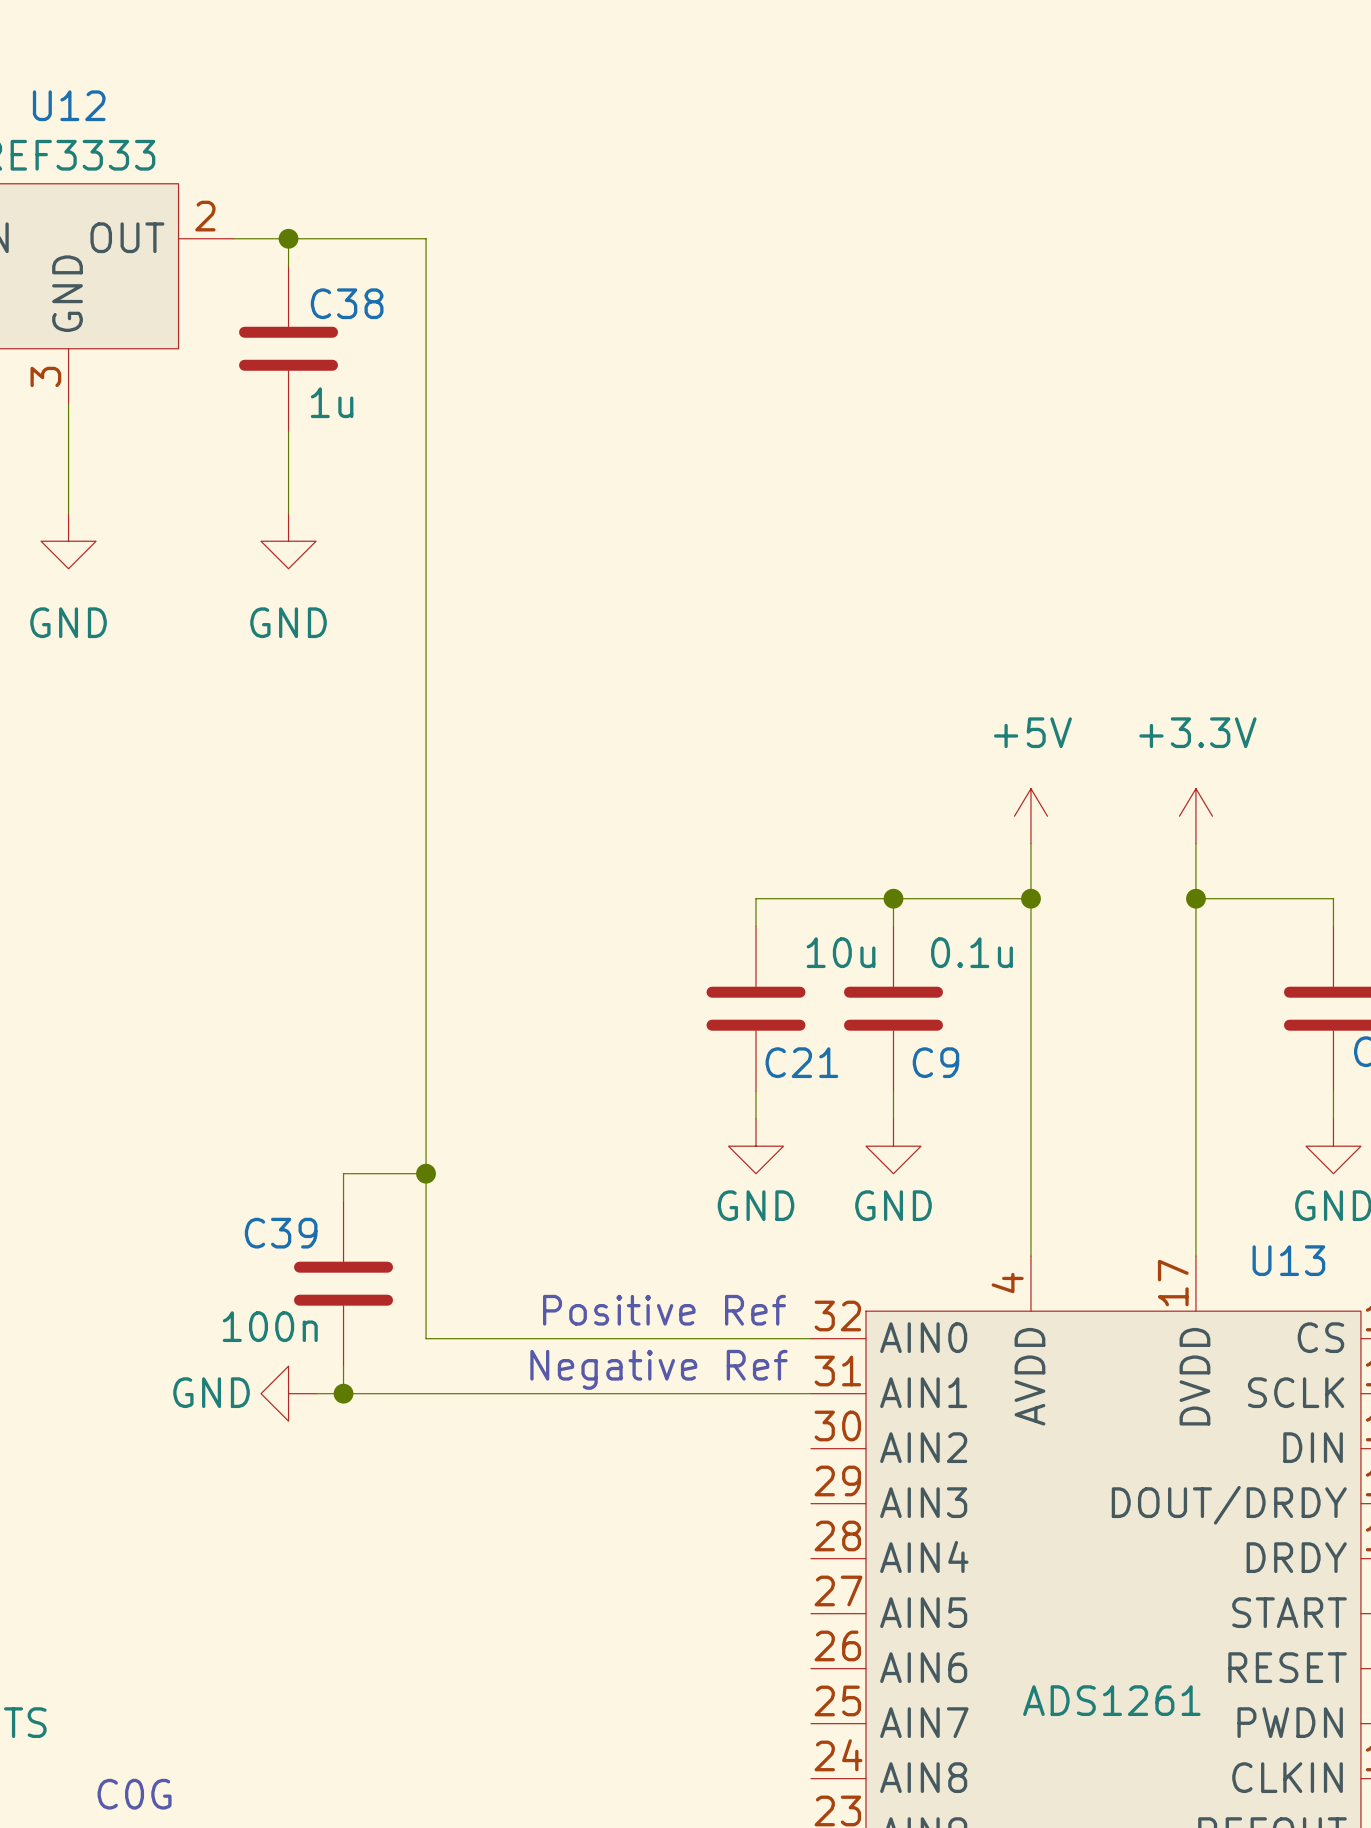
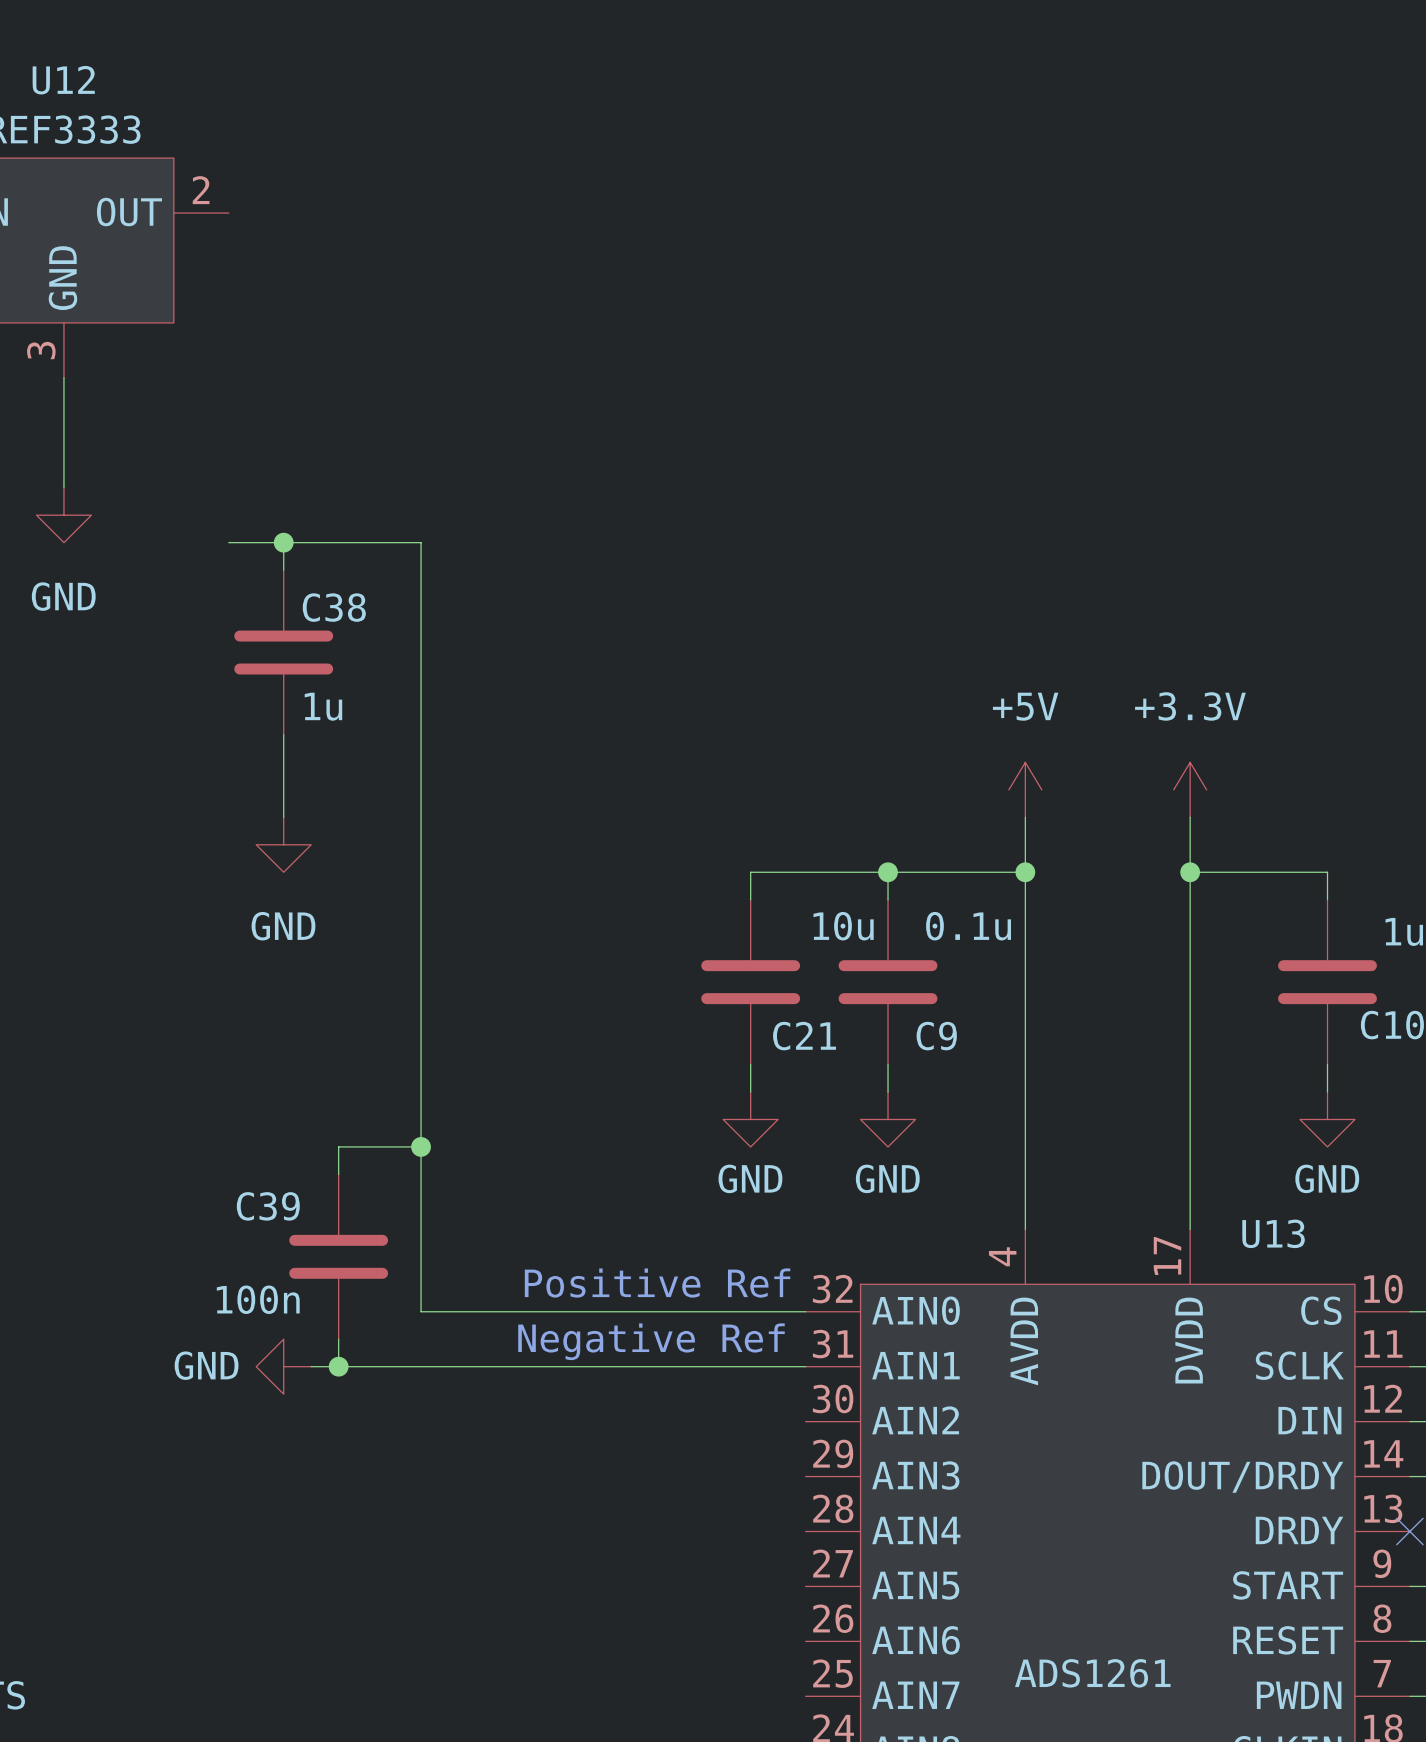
wire: (233, 238) (426, 238) (426, 568) -> (228, 542) (421, 542)
wire: (288, 238) (288, 266) -> (283, 542) (283, 570)
junction: (288, 238) -> none
C38 position: (288, 348) -> (283, 652)
wire: (288, 431) (288, 513) -> (283, 734) (283, 817)
power symbol: GND (288, 541) -> none
junction: none -> (283, 542)
power symbol: none -> GND (283, 844)

